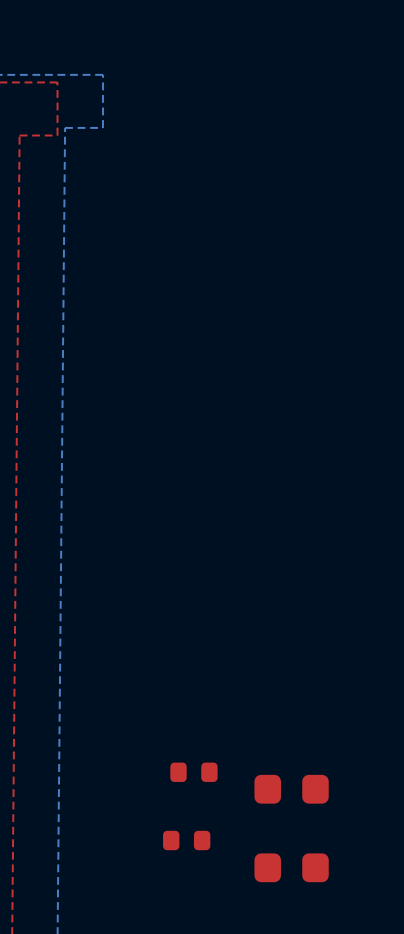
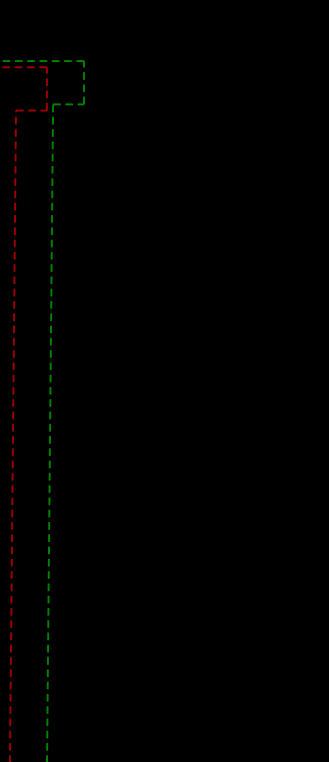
part: (193, 772) -> none
part: (291, 789) -> none
part: (186, 840) -> none
part: (291, 867) -> none

